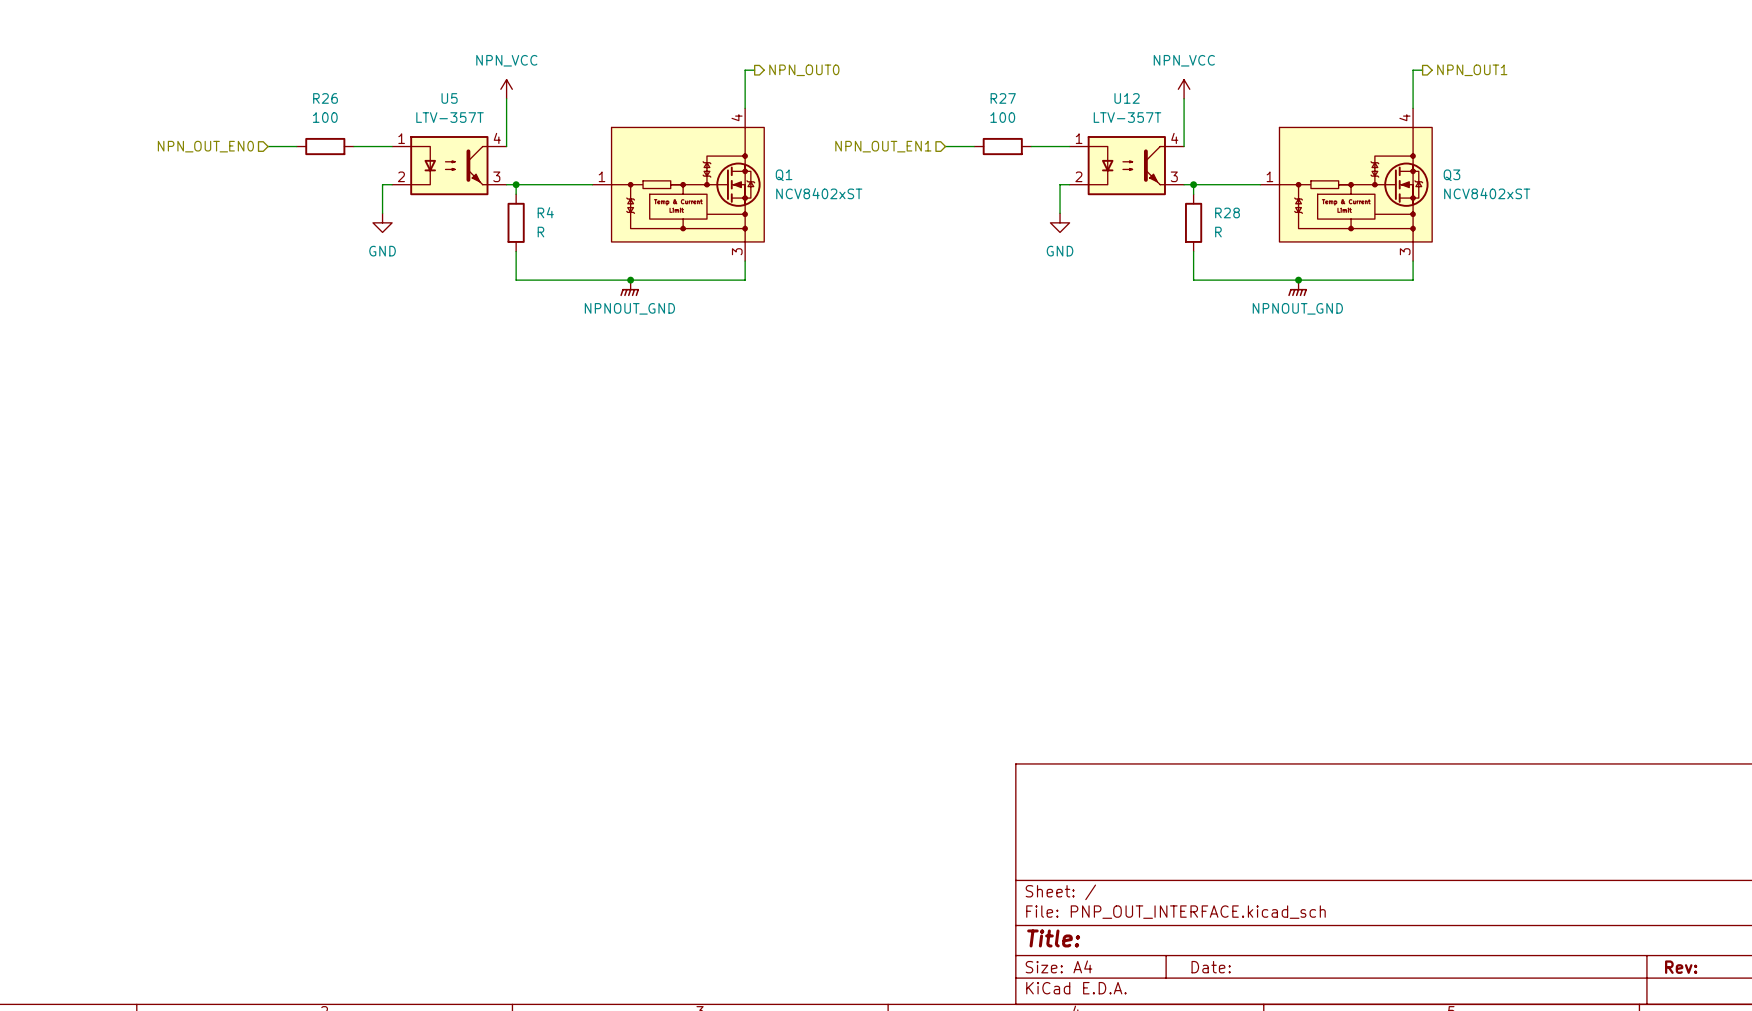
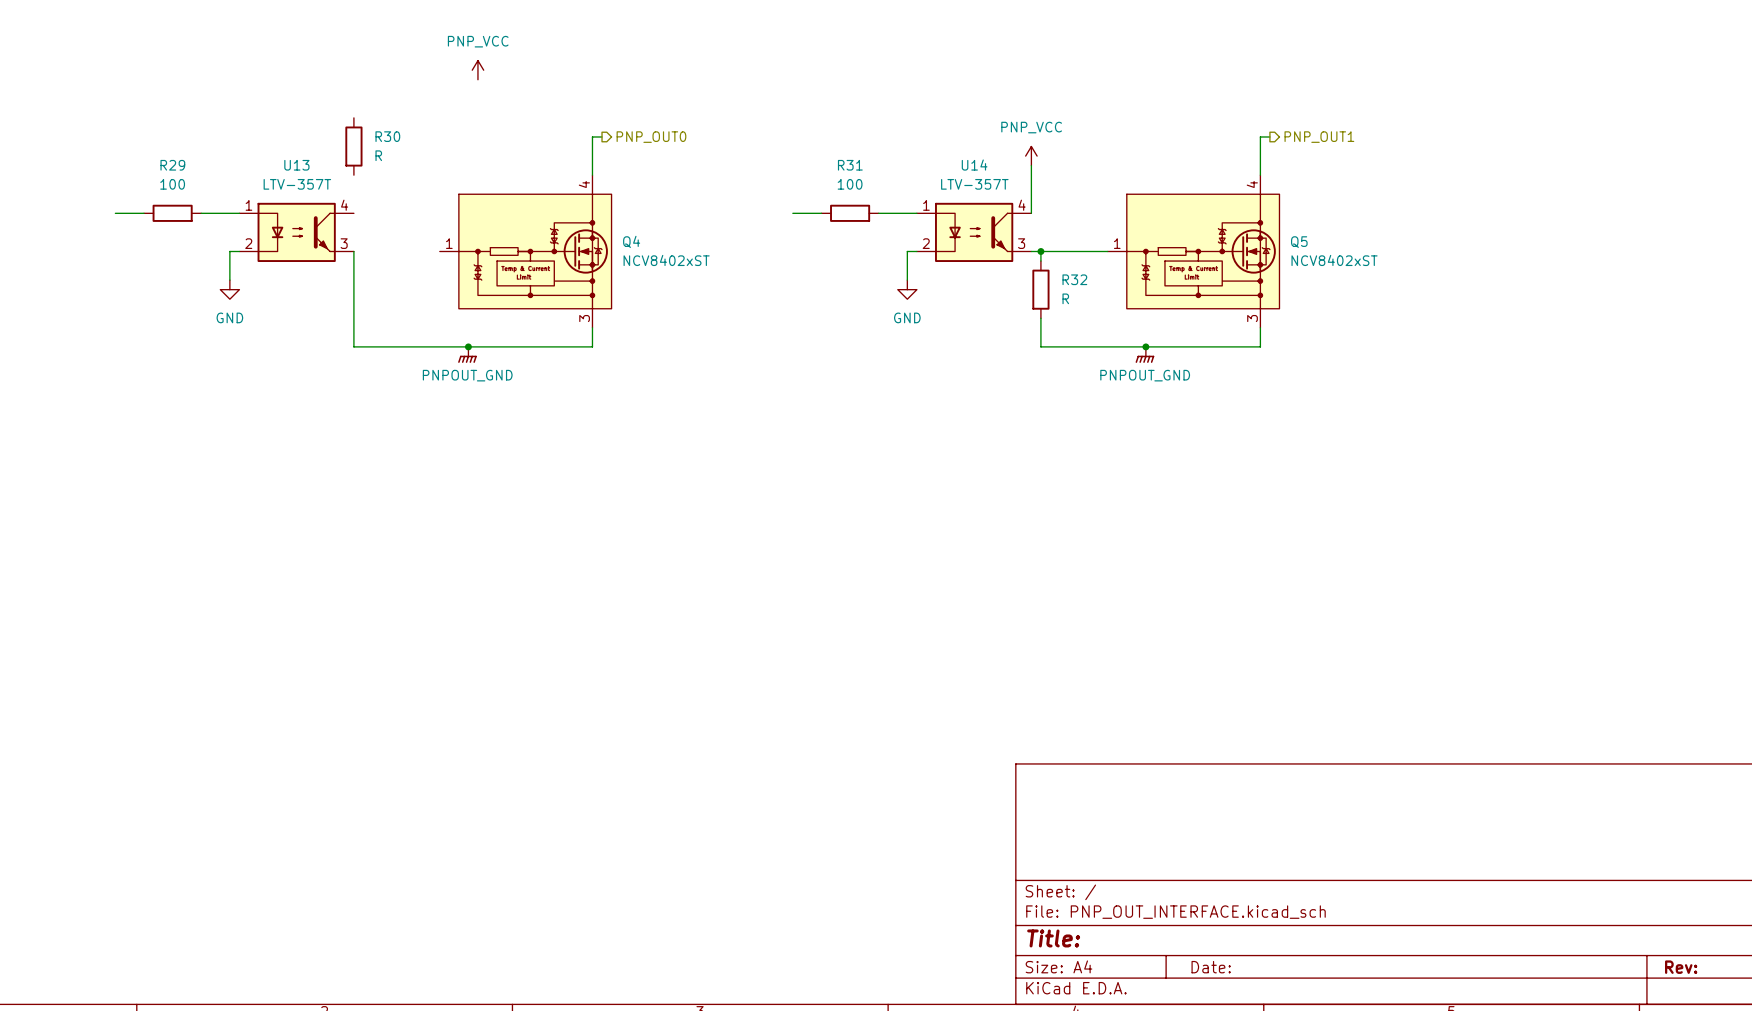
power symbol: none -> PNP_VCC (477, 70)
wire: (754, 70) (745, 70) (745, 108) -> (602, 136) (592, 136) (592, 175)
hierarchical label: NPN_OUT0 (804, 70) -> none
wire: (1422, 70) (1413, 70) (1413, 108) -> (1269, 136) (1260, 136) (1260, 175)
hierarchical label: NPN_OUT1 (1472, 70) -> none
power symbol: NPN_VCC (506, 89) -> none
power symbol: NPN_VCC (1184, 89) -> none
wire: (506, 98) (506, 146) -> none
wire: (1184, 98) (1184, 146) -> (1031, 165) (1031, 213)
hierarchical label: none -> PNP_OUT0 (651, 137)
hierarchical label: none -> PNP_OUT1 (1319, 137)
hierarchical label: NPN_OUT_EN0 (205, 146) -> none
wire: (268, 146) (296, 146) -> (115, 213) (144, 213)
R26: 100 (325, 146) -> none
wire: (353, 146) (392, 146) -> (201, 213) (239, 213)
R30: none -> R (353, 146)
hierarchical label: NPN_OUT_EN1 (883, 146) -> none
wire: (945, 146) (974, 146) -> (792, 213) (821, 213)
R27: 100 (1002, 146) -> none
wire: (1031, 146) (1069, 146) -> (878, 213) (916, 213)
power symbol: none -> PNP_VCC (1031, 156)
U5: LTV-357T (449, 165) -> none
U12: LTV-357T (1126, 165) -> none
wire: (392, 184) (382, 184) (382, 213) -> (239, 251) (229, 251) (229, 280)
wire: (506, 184) (592, 184) -> none
wire: (516, 184) (516, 194) -> none
junction: (516, 184) -> none
Q1: NCV8402xST (678, 184) -> none
wire: (1069, 184) (1060, 184) (1060, 213) -> (916, 251) (907, 251) (907, 280)
wire: (1184, 184) (1260, 184) -> (1031, 251) (1107, 251)
wire: (1193, 184) (1193, 194) -> (1040, 251) (1040, 261)
junction: (1193, 184) -> none
Q3: NCV8402xST (1346, 184) -> none
R29: none -> 100 (172, 213)
R31: none -> 100 (850, 213)
power symbol position: GND (382, 222) -> GND (229, 289)
R4: R (516, 222) -> none
power symbol position: GND (1060, 222) -> GND (907, 289)
R28: R (1193, 222) -> none
U13: none -> LTV-357T (296, 232)
U14: none -> LTV-357T (974, 232)
wire: none -> (353, 251) (353, 346) (592, 346) (592, 327)
wire: (516, 251) (516, 280) (745, 280) (745, 261) -> none
Q4: none -> NCV8402xST (525, 251)
junction: none -> (1040, 251)
wire: (1193, 251) (1193, 280) (1413, 280) (1413, 261) -> (1040, 318) (1040, 346) (1260, 346) (1260, 327)
Q5: none -> NCV8402xST (1193, 251)
junction: (630, 280) -> none
junction: (1298, 280) -> none
power symbol: NPNOUT_GND (629, 288) -> none
power symbol: NPNOUT_GND (1297, 288) -> none
R32: none -> R (1040, 289)
junction: none -> (468, 346)
junction: none -> (1145, 346)
power symbol: none -> PNPOUT_GND (467, 354)
power symbol: none -> PNPOUT_GND (1144, 354)

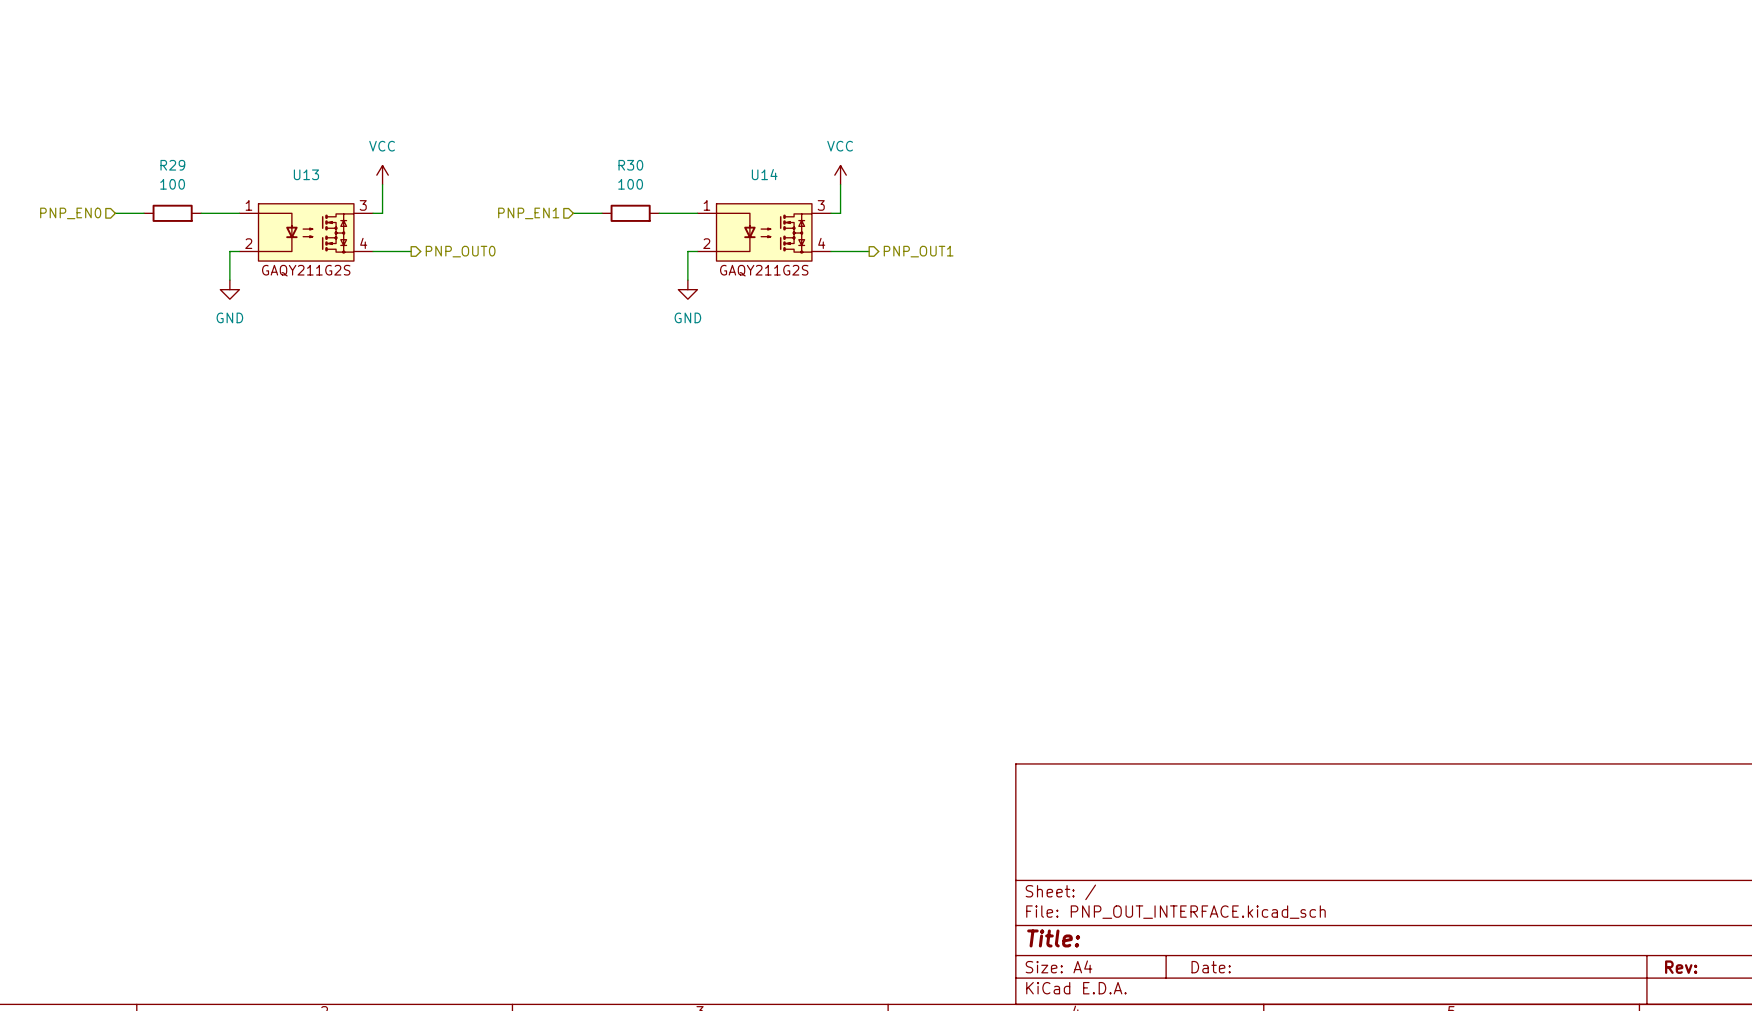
power symbol: PNP_VCC (477, 70) -> none
R30 name position: R30 (387, 136) -> R30 (630, 165)
wire: (602, 136) (592, 136) (592, 175) -> none
wire: (1269, 136) (1260, 136) (1260, 175) -> none
hierarchical label: PNP_OUT0 (651, 137) -> none
hierarchical label: PNP_OUT1 (1319, 137) -> none
R30 rotation: 0° (353, 146) -> 90° clockwise (630, 213)
R30 position: (353, 146) -> (630, 213)
R30 value: R (378, 155) -> 100 (630, 184)
power symbol: PNP_VCC (1031, 156) -> none
wire: (1031, 165) (1031, 213) -> none
power symbol: none -> VCC (382, 175)
power symbol: none -> VCC (840, 175)
U13 value: LTV-357T (297, 184) -> none
wire: none -> (382, 184) (382, 213) (373, 213)
wire: none -> (840, 184) (840, 213) (831, 213)
U14 value: LTV-357T (974, 184) -> none
U13 symbol: [239, 202, 354, 262] -> [239, 203, 374, 262]
U14 symbol: [916, 202, 1032, 262] -> [697, 203, 832, 262]
hierarchical label: none -> PNP_EN0 (70, 213)
hierarchical label: none -> PNP_EN1 (528, 213)
wire: none -> (659, 213) (697, 213)
R31: 100 (850, 213) -> none
wire: (878, 213) (916, 213) -> (831, 251) (869, 251)
wire: (353, 251) (353, 346) (592, 346) (592, 327) -> none
wire: none -> (373, 251) (411, 251)
hierarchical label: none -> PNP_OUT0 (460, 251)
Q4: NCV8402xST (525, 251) -> none
wire: none -> (697, 251) (687, 251) (687, 280)
wire: (916, 251) (907, 251) (907, 280) -> none
hierarchical label: none -> PNP_OUT1 (918, 251)
wire: (1031, 251) (1107, 251) -> none
wire: (1040, 251) (1040, 261) -> none
junction: (1040, 251) -> none
Q5: NCV8402xST (1193, 251) -> none
power symbol: none -> GND (687, 289)
power symbol: GND (907, 289) -> none
R32: R (1040, 289) -> none
wire: (1040, 318) (1040, 346) (1260, 346) (1260, 327) -> none
junction: (468, 346) -> none
junction: (1145, 346) -> none
power symbol: PNPOUT_GND (467, 354) -> none
power symbol: PNPOUT_GND (1144, 354) -> none

